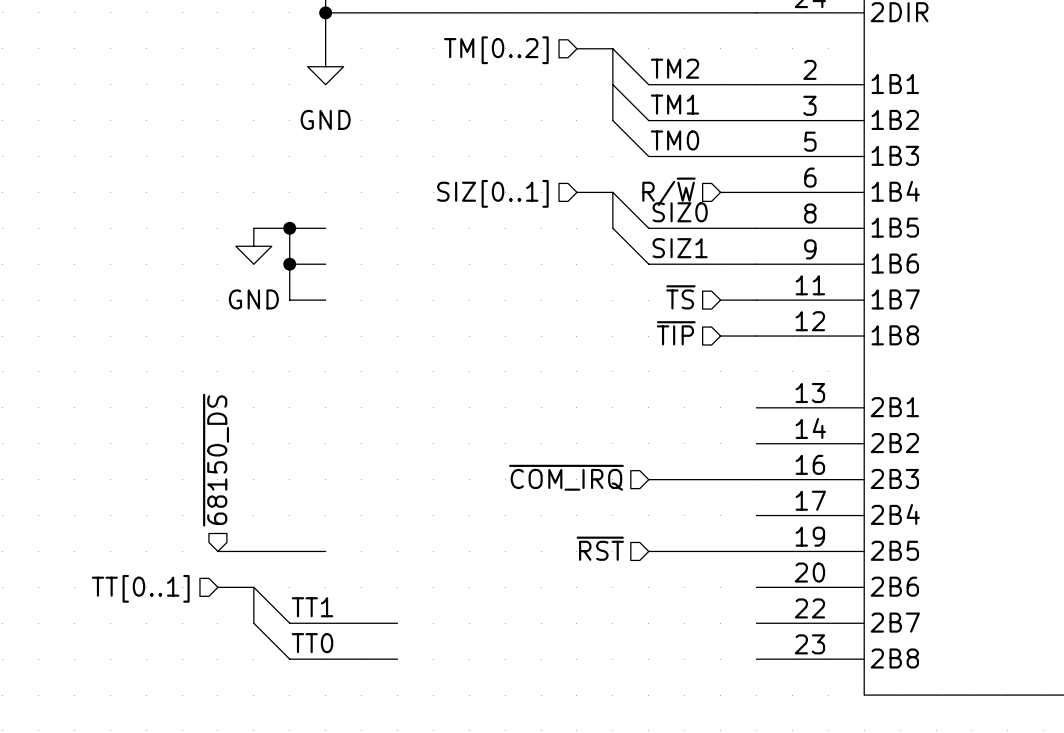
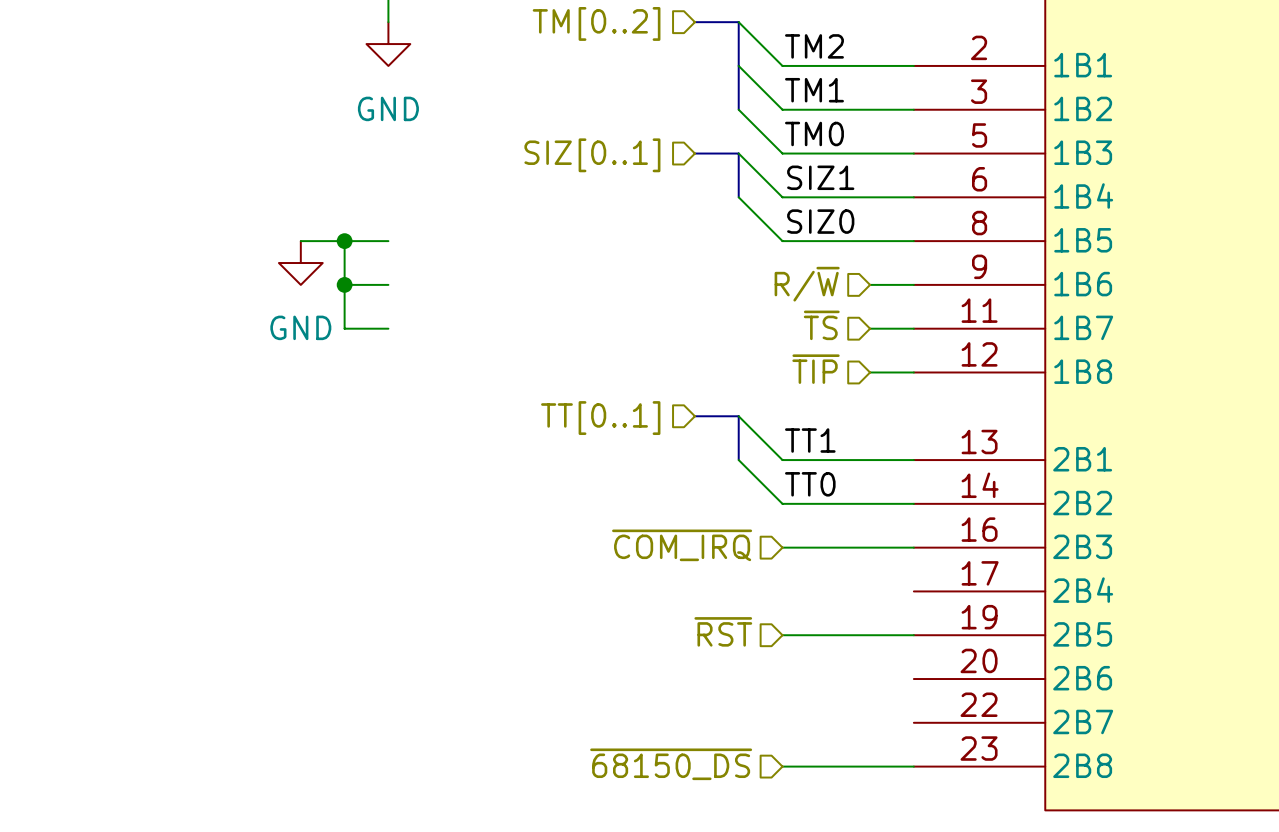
hierarchical label position: R/~{W} (668, 191) -> R/~{W} (807, 284)
bus: (576, 192) (612, 192) (612, 228) -> (694, 153) (738, 153) (738, 197)
hierarchical label position: SIZ[0..1] (492, 193) -> SIZ[0..1] (592, 155)
wire: (612, 228) (648, 264) (720, 264) -> (738, 153) (782, 197) (870, 197)
label position: SIZ1 (680, 248) -> SIZ1 (820, 177)
bus: none -> (694, 416) (738, 416) (738, 460)
wire: none -> (738, 416) (782, 460) (913, 460)
hierarchical label: none -> TT[0..1] (600, 418)
label: none -> TT1 (810, 440)
wire: none -> (738, 460) (782, 503) (913, 503)
label: none -> TT0 (810, 484)
hierarchical label: ~{68150_DS} (216, 460) -> none
wire: (217, 551) (325, 551) -> none
bus: (217, 587) (253, 587) (253, 623) -> none
wire: (253, 587) (289, 623) (397, 623) -> none
hierarchical label: TT[0..1] (140, 588) -> none
label: TT1 (312, 607) -> none
wire: (253, 623) (289, 659) (397, 659) -> none
label: TT0 (312, 643) -> none
hierarchical label: none -> ~{68150_DS} (671, 764)
wire: none -> (782, 766) (913, 766)

